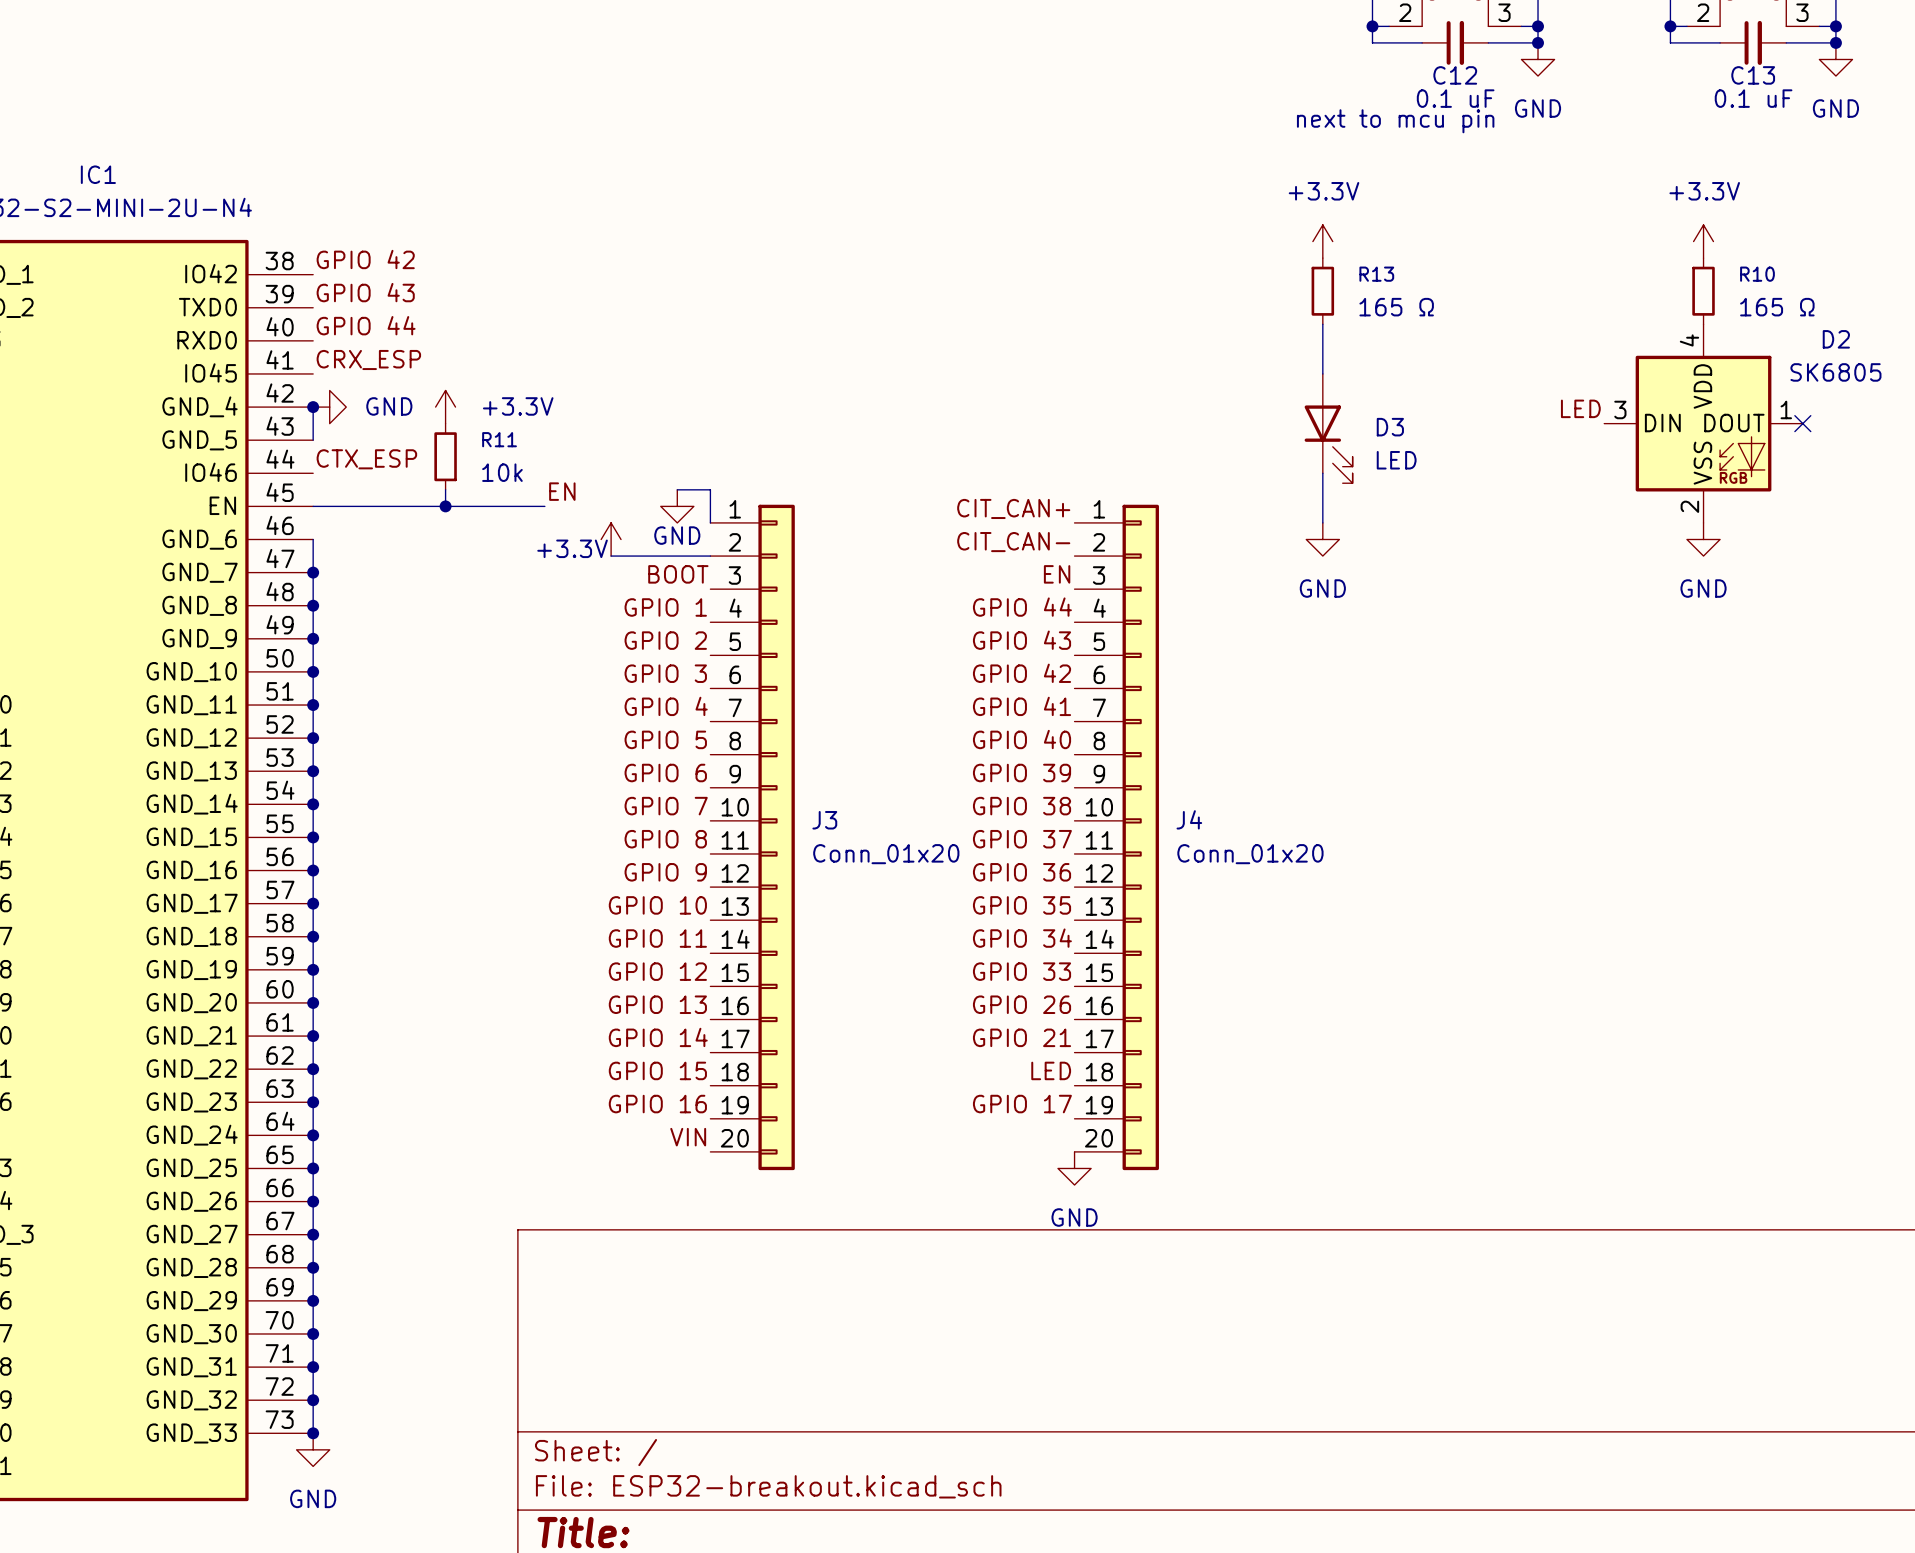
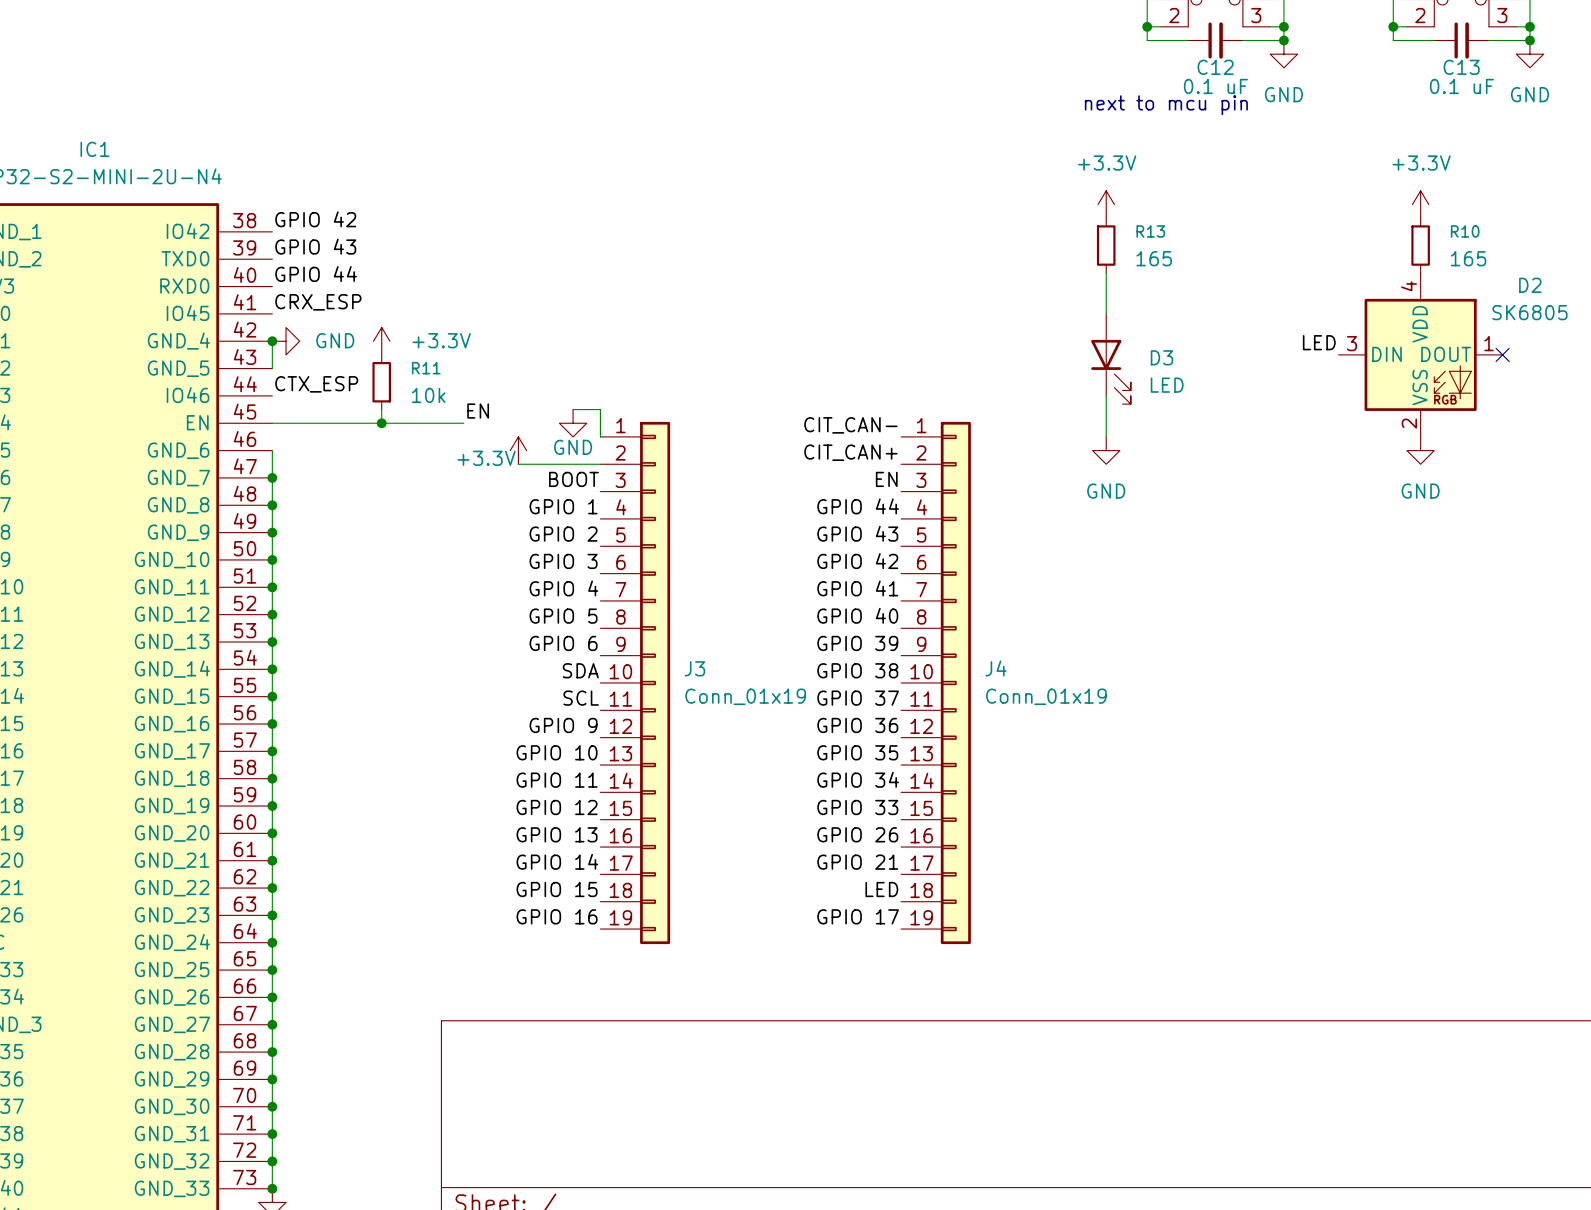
R13 value: 165 Ω (1396, 307) -> 165 (1154, 258)
R10 value: 165 Ω (1777, 307) -> 165 (1468, 258)
J3 symbol: [710, 504, 795, 1171] -> [600, 421, 671, 945]
J4 symbol: [1074, 504, 1159, 1171] -> [901, 421, 971, 945]
label: CIT_CAN+ (1013, 508) -> CIT_CAN- (850, 425)
label: CIT_CAN- (1013, 542) -> CIT_CAN+ (850, 452)
label: GPIO 7 (666, 806) -> SDA (580, 670)
label: GPIO 8 (665, 839) -> SCL (581, 698)
J3 value: Conn_01x20 (886, 854) -> Conn_01x19 (745, 696)
J4 value: Conn_01x20 (1250, 854) -> Conn_01x19 (1046, 696)
label: VIN (688, 1137) -> none
power symbol: GND (1074, 1168) -> none

